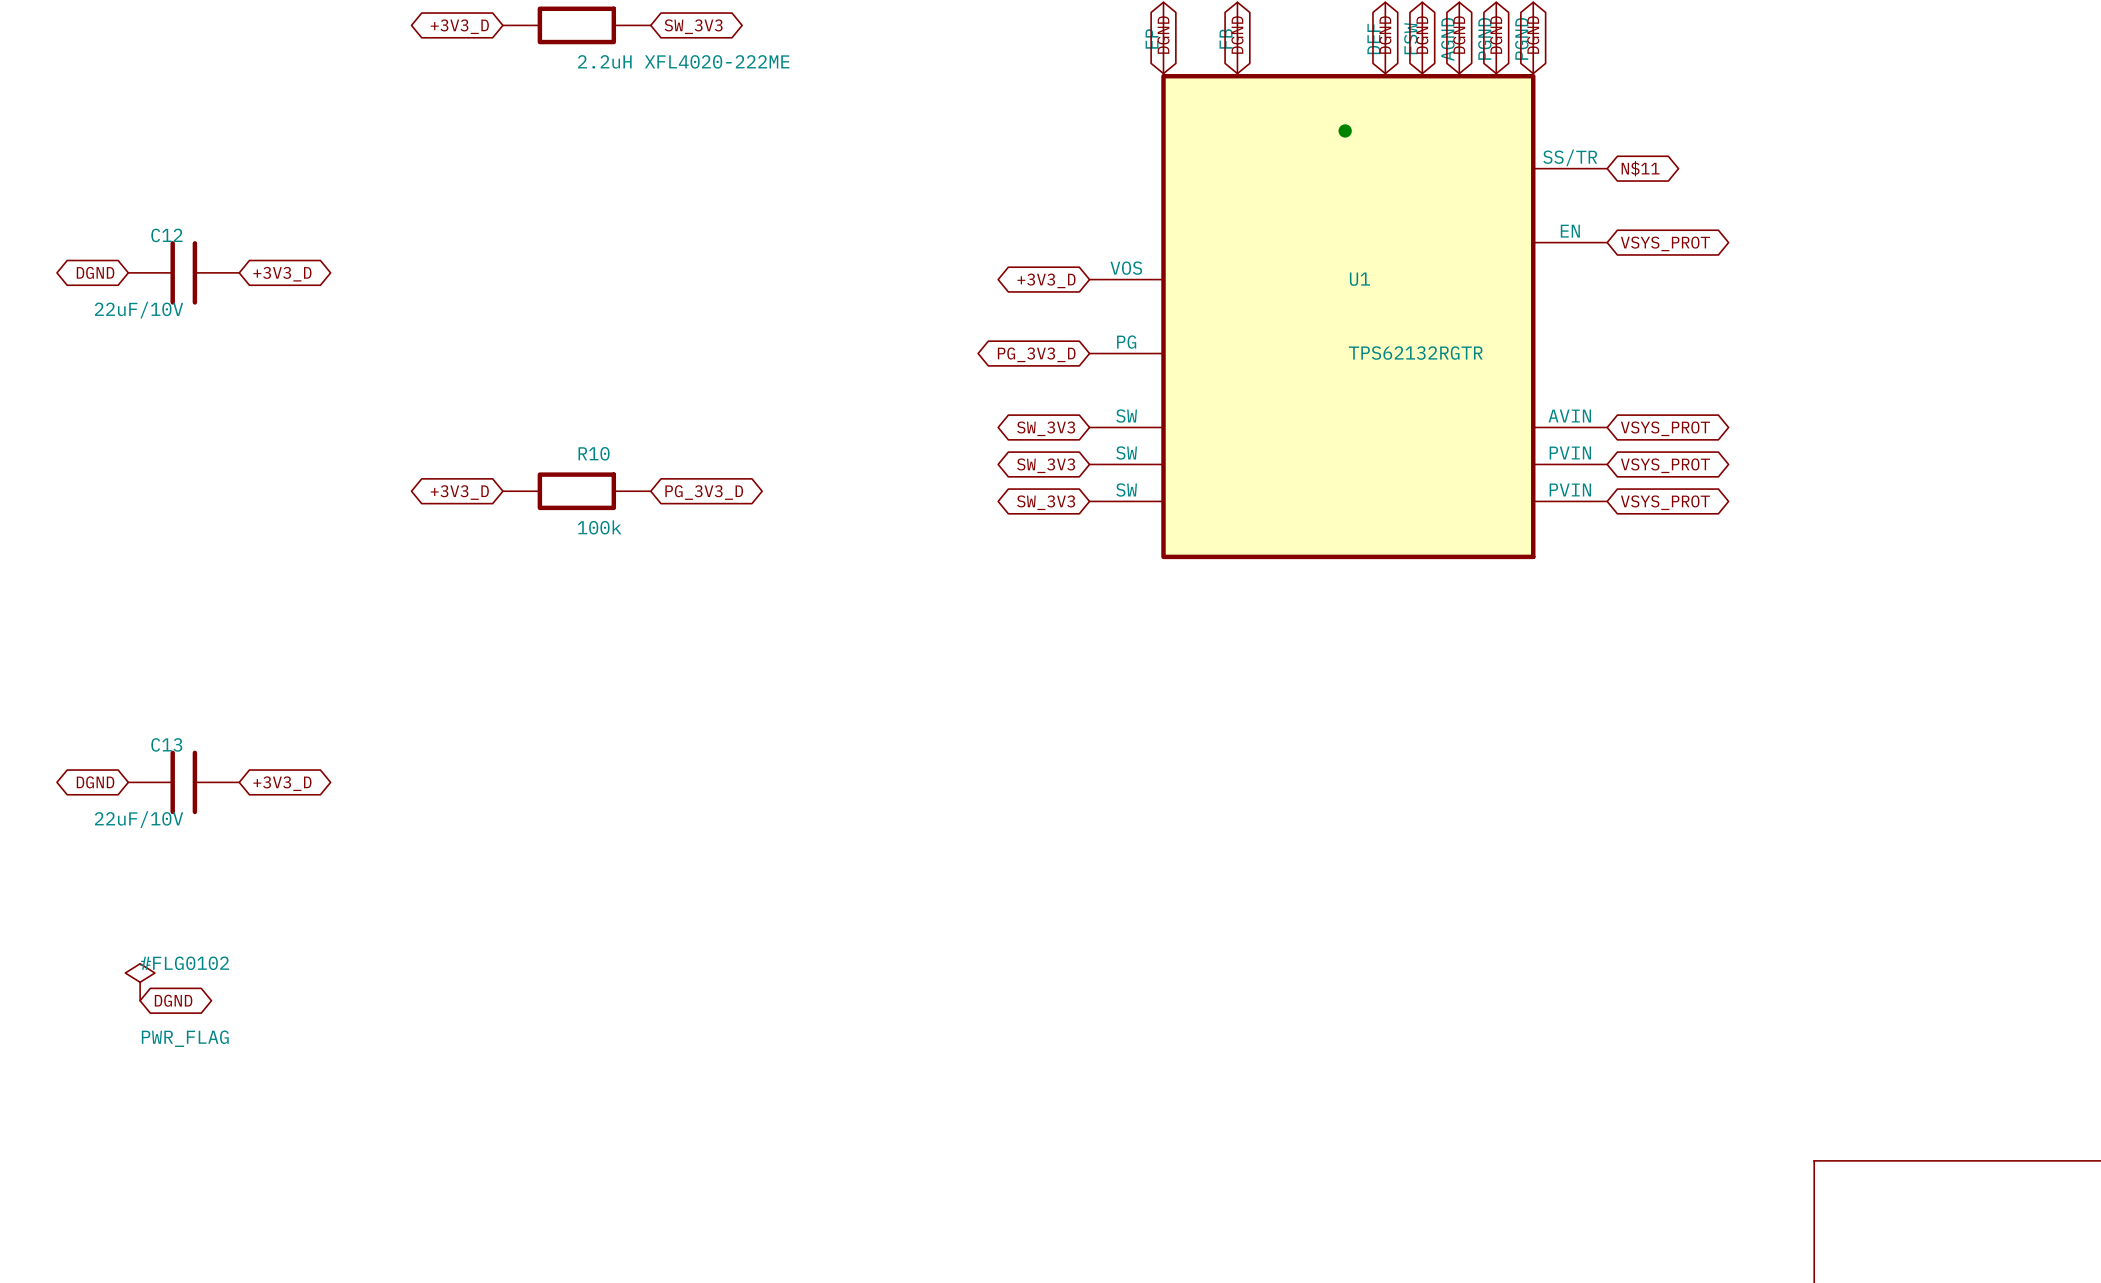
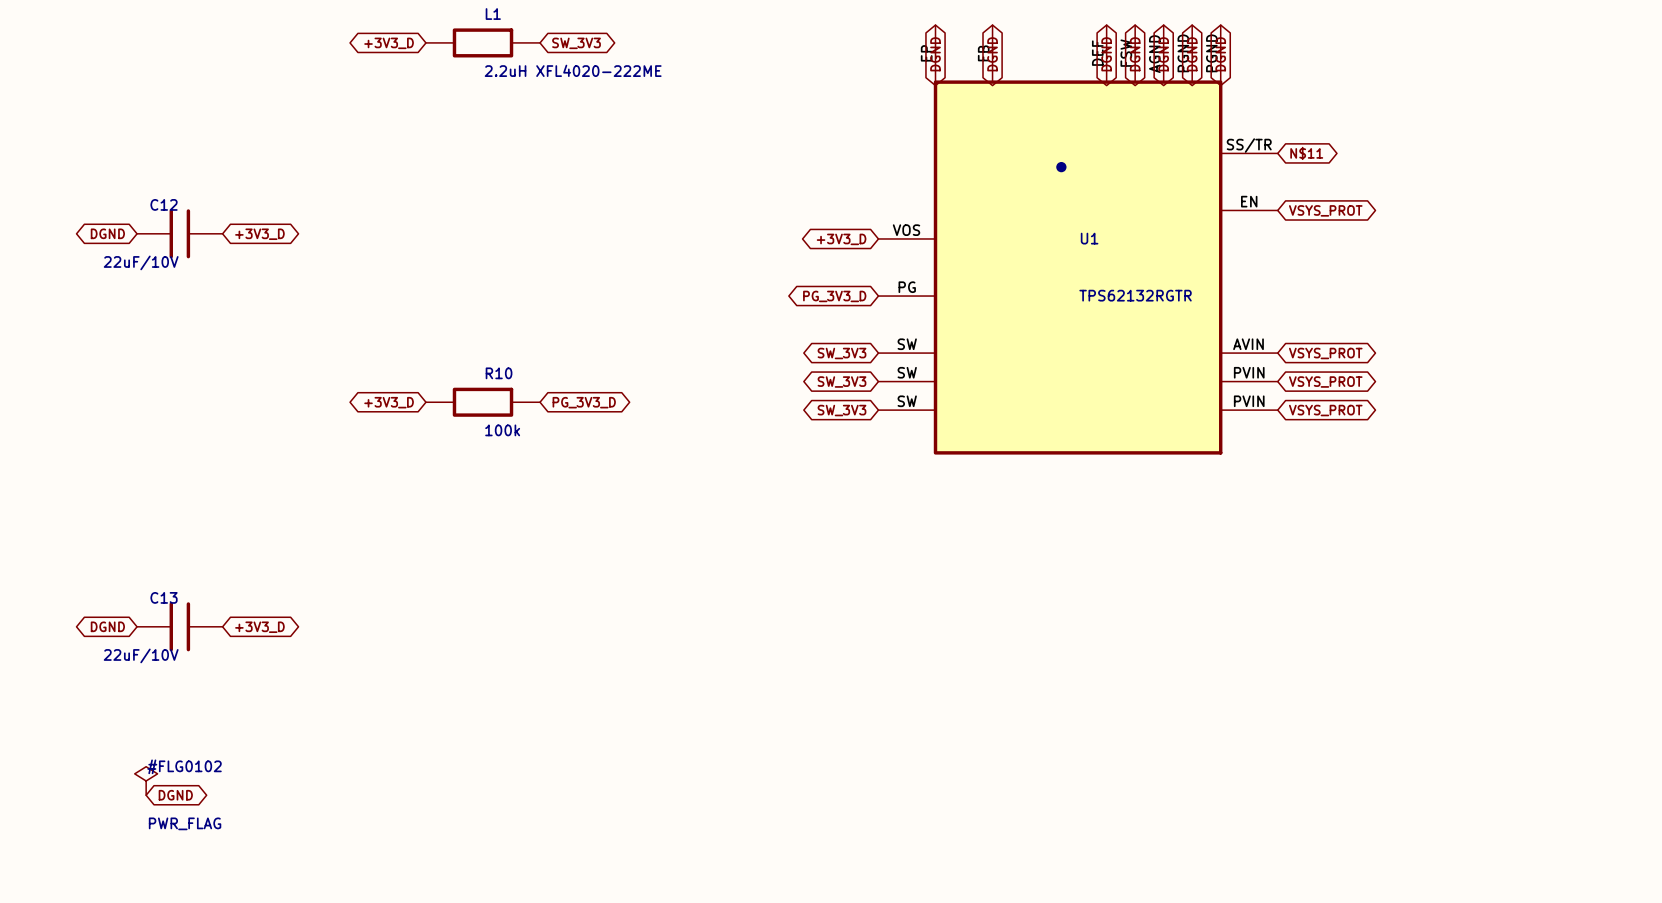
junction position: (1345, 130) -> (1061, 167)

